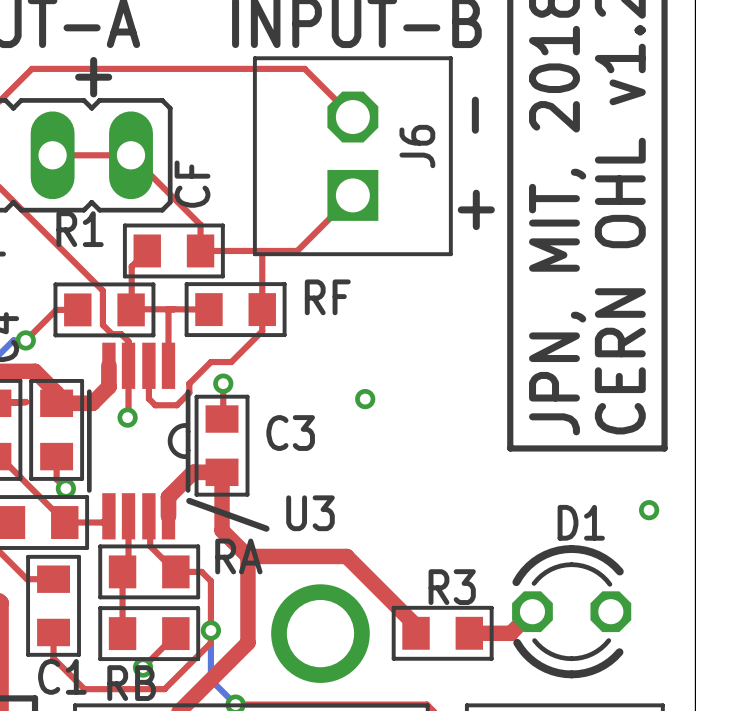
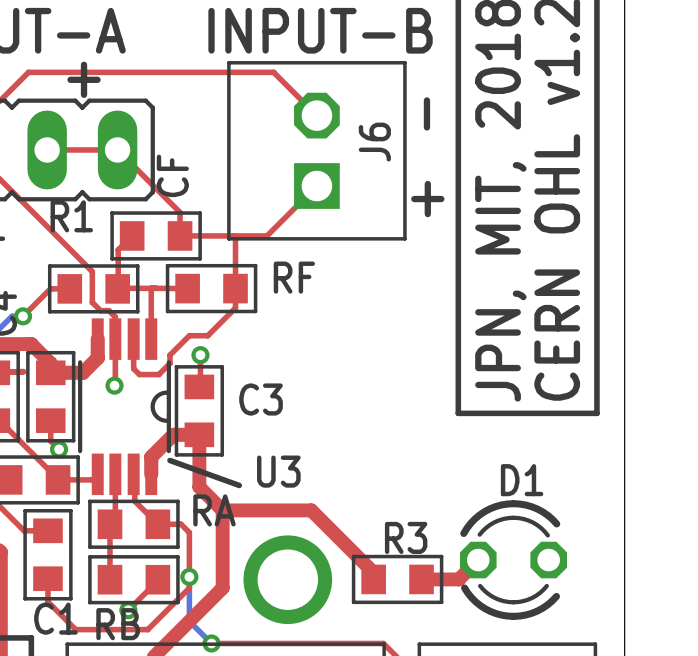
via: (365, 399) -> none
via: (649, 510) -> none

